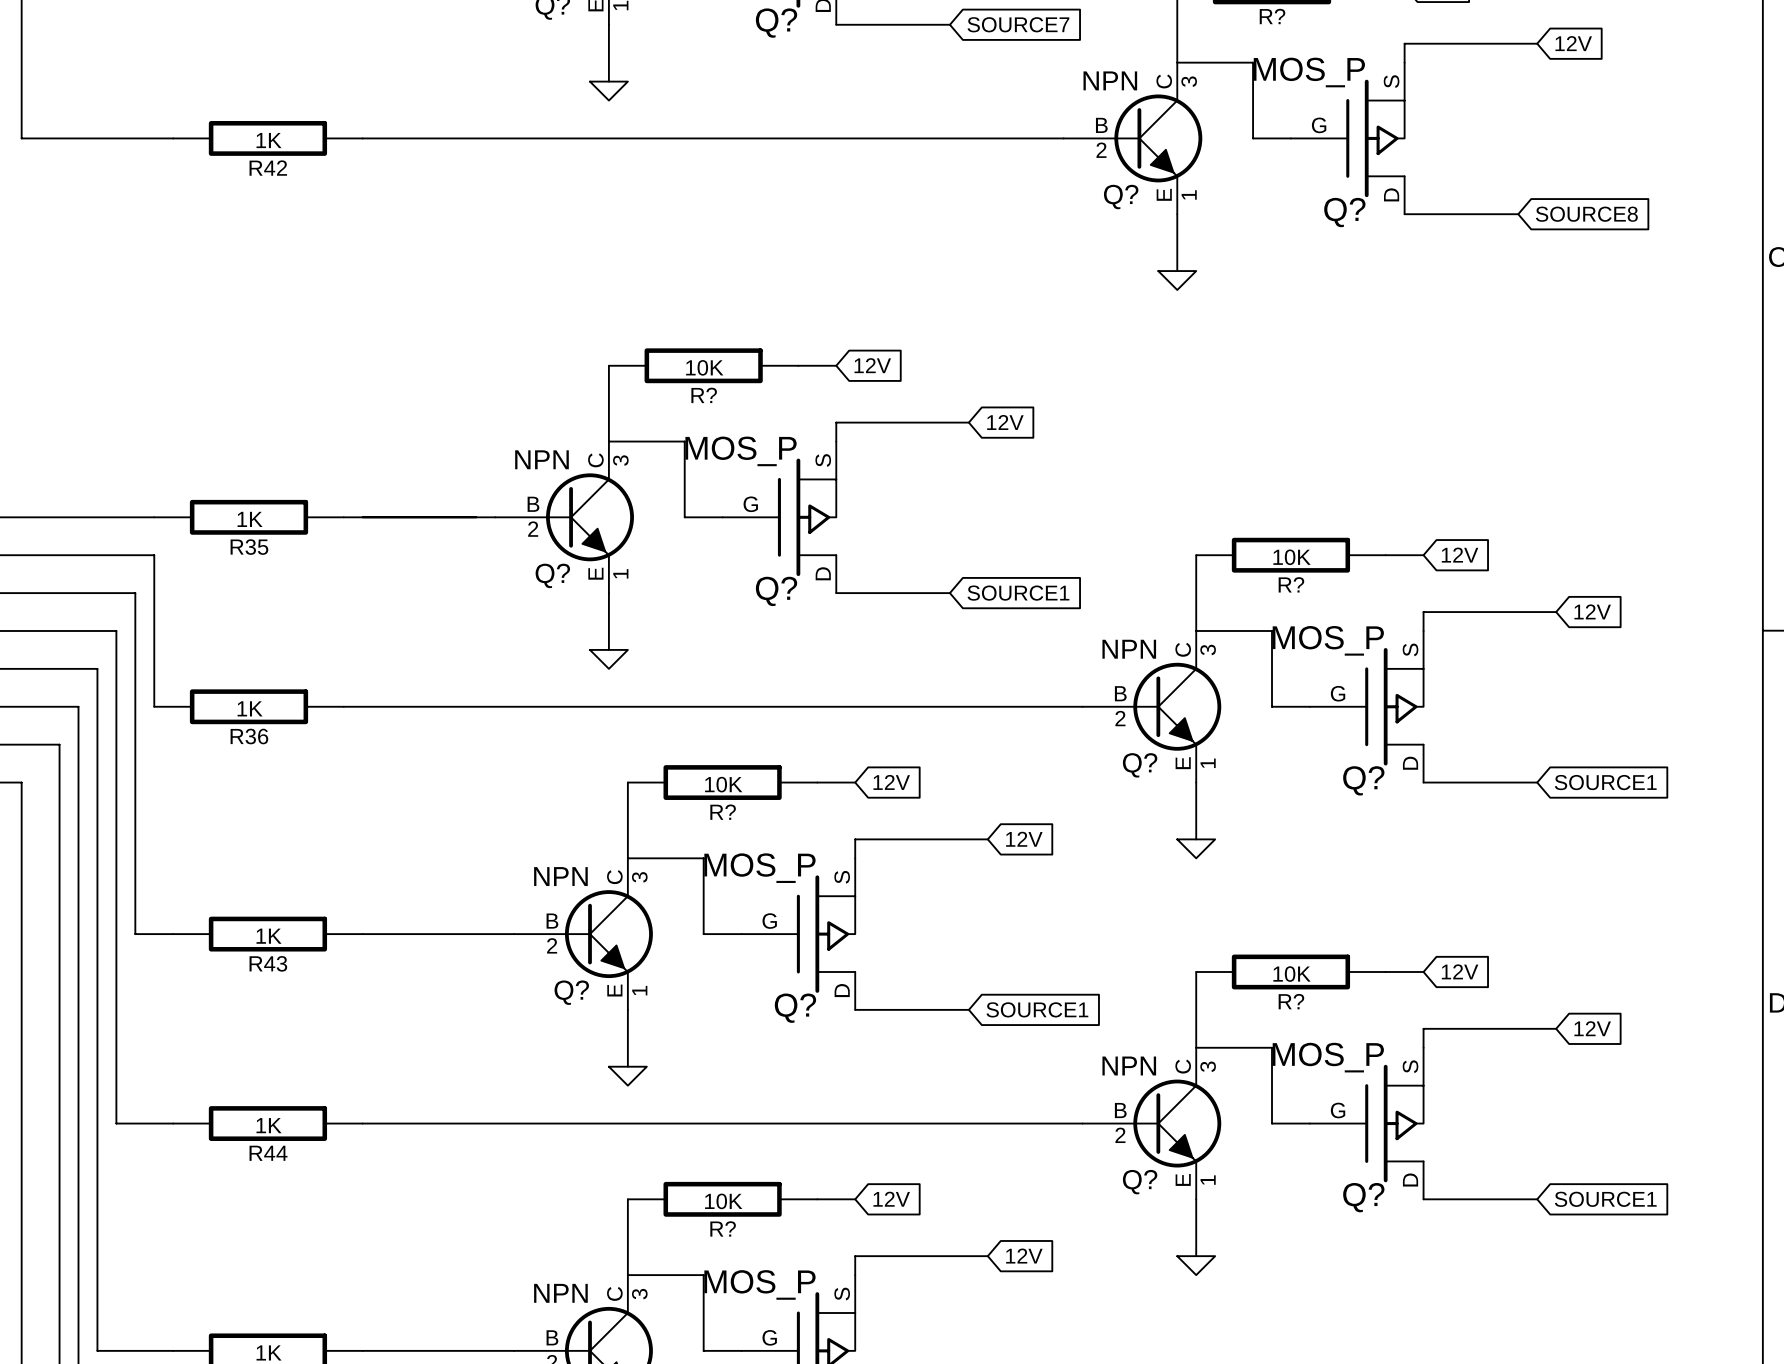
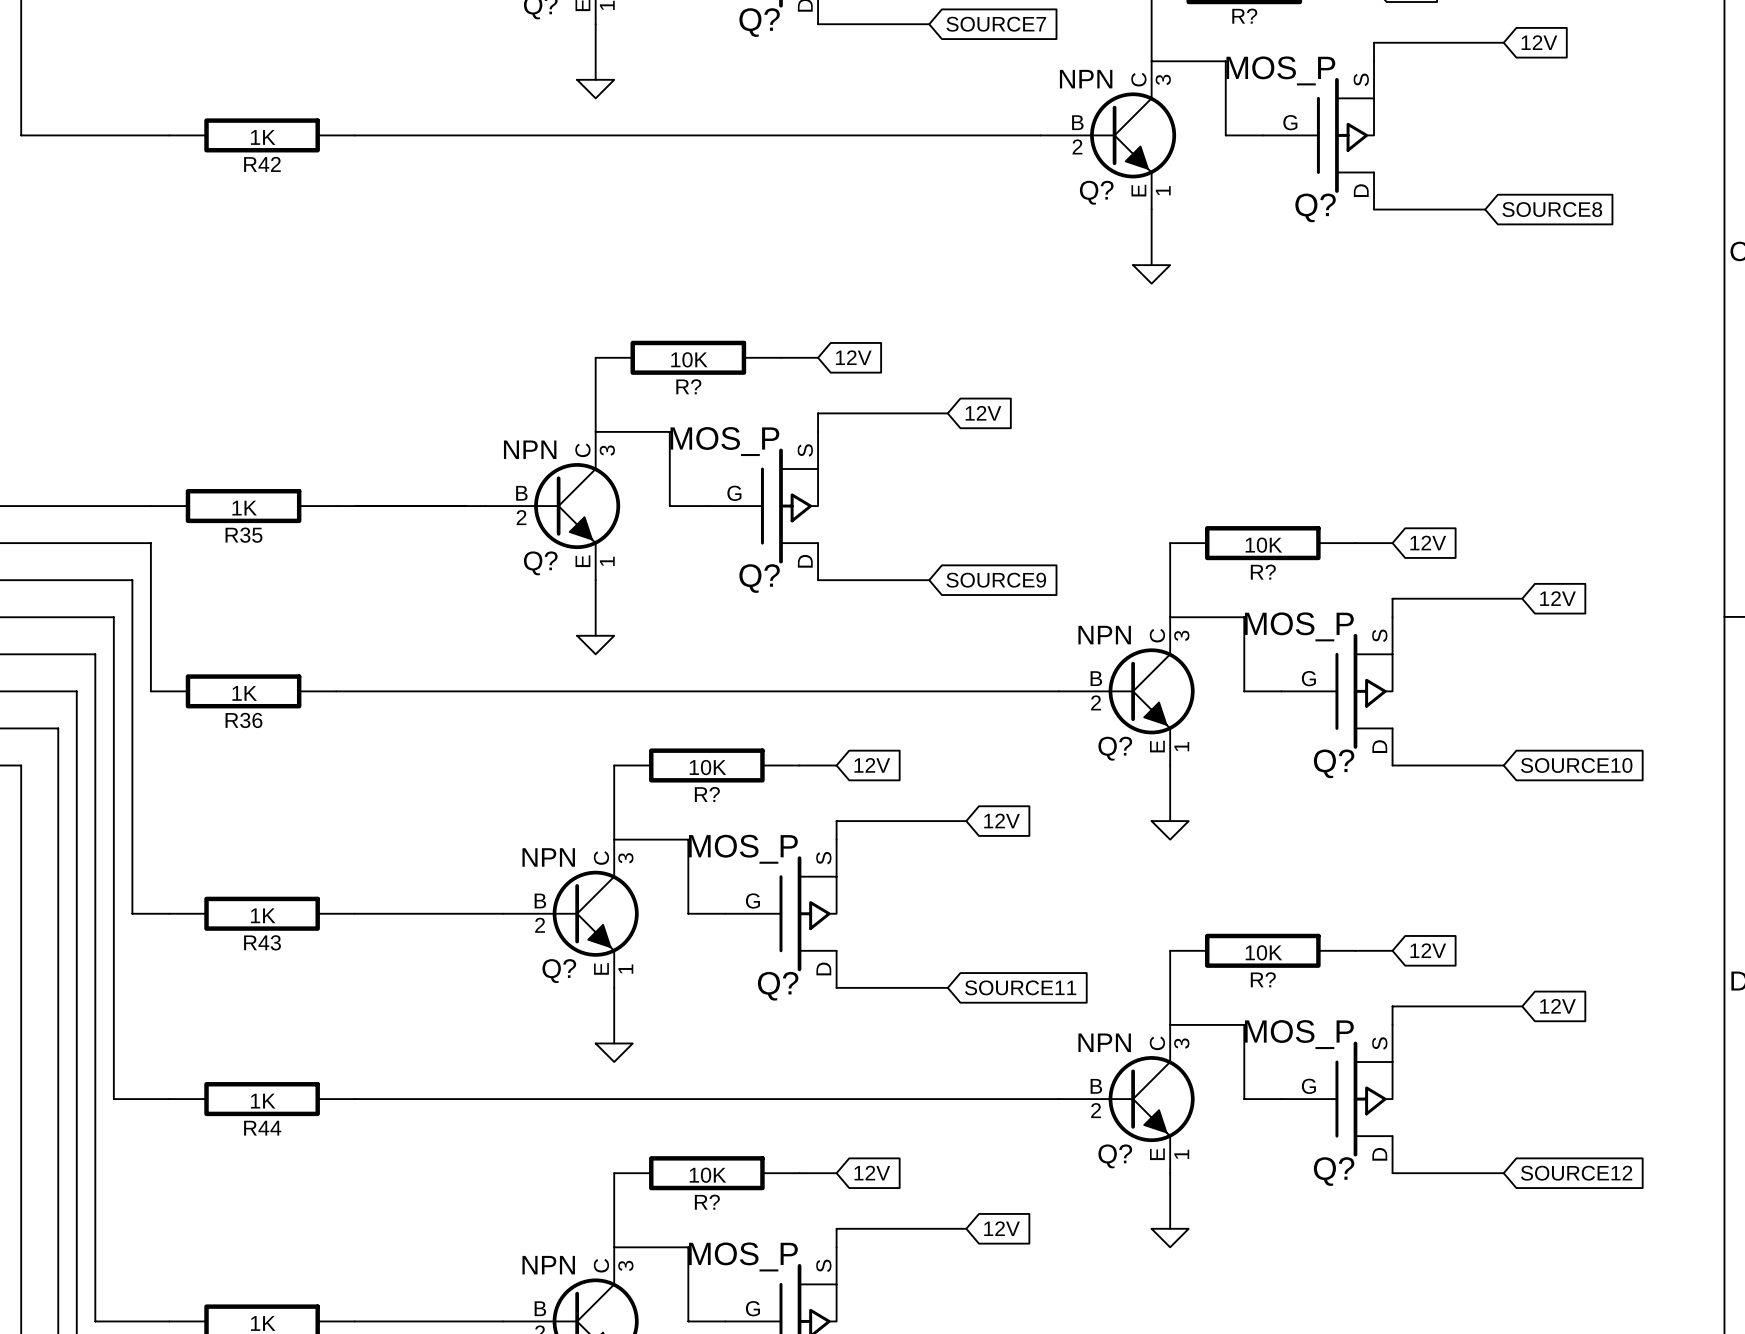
global label: SOURCE1 (1018, 593) -> SOURCE9 (996, 580)
global label: SOURCE1 (1605, 782) -> SOURCE10 (1576, 765)
global label: SOURCE1 (1037, 1009) -> SOURCE11 (1020, 987)
global label: SOURCE1 (1605, 1199) -> SOURCE12 (1576, 1173)

